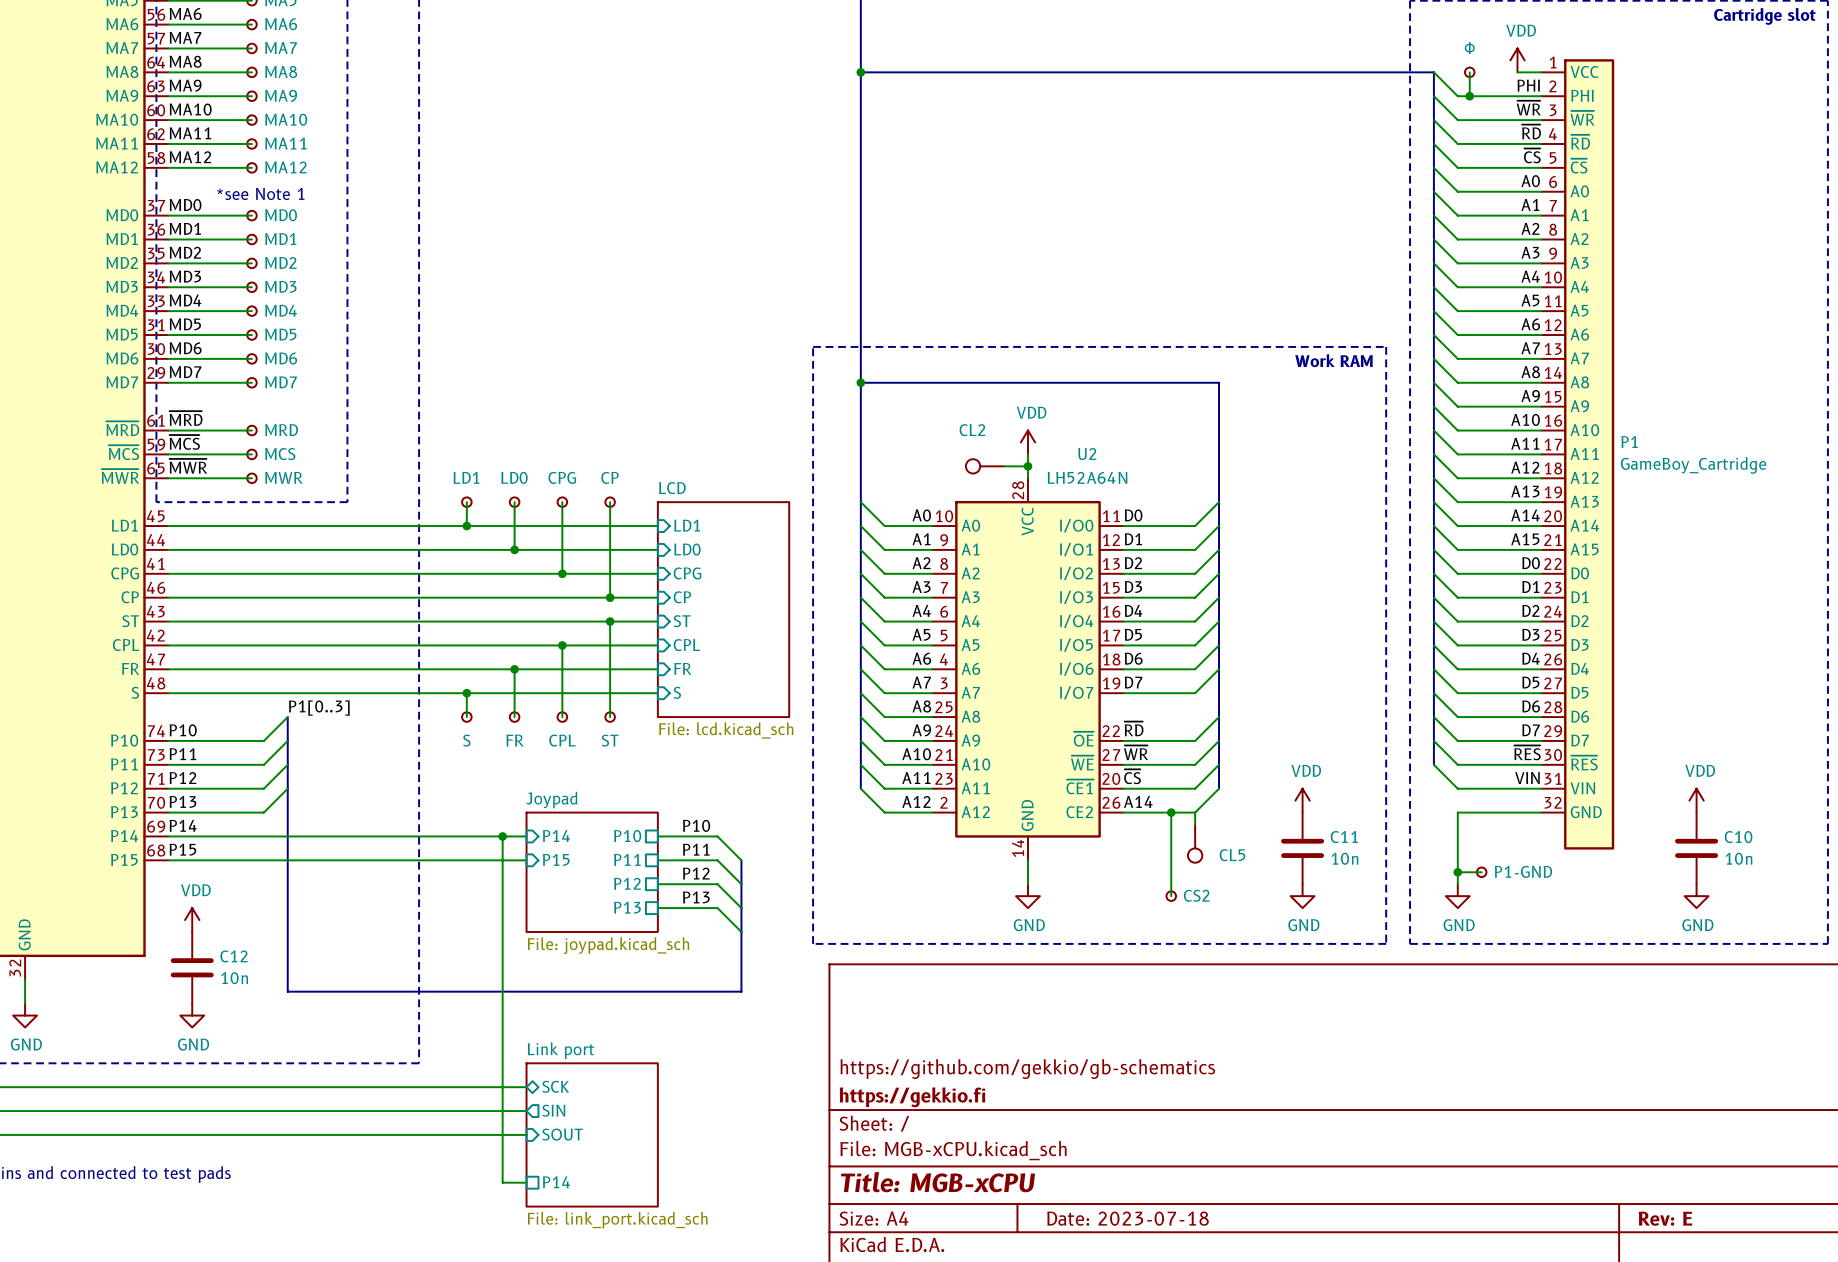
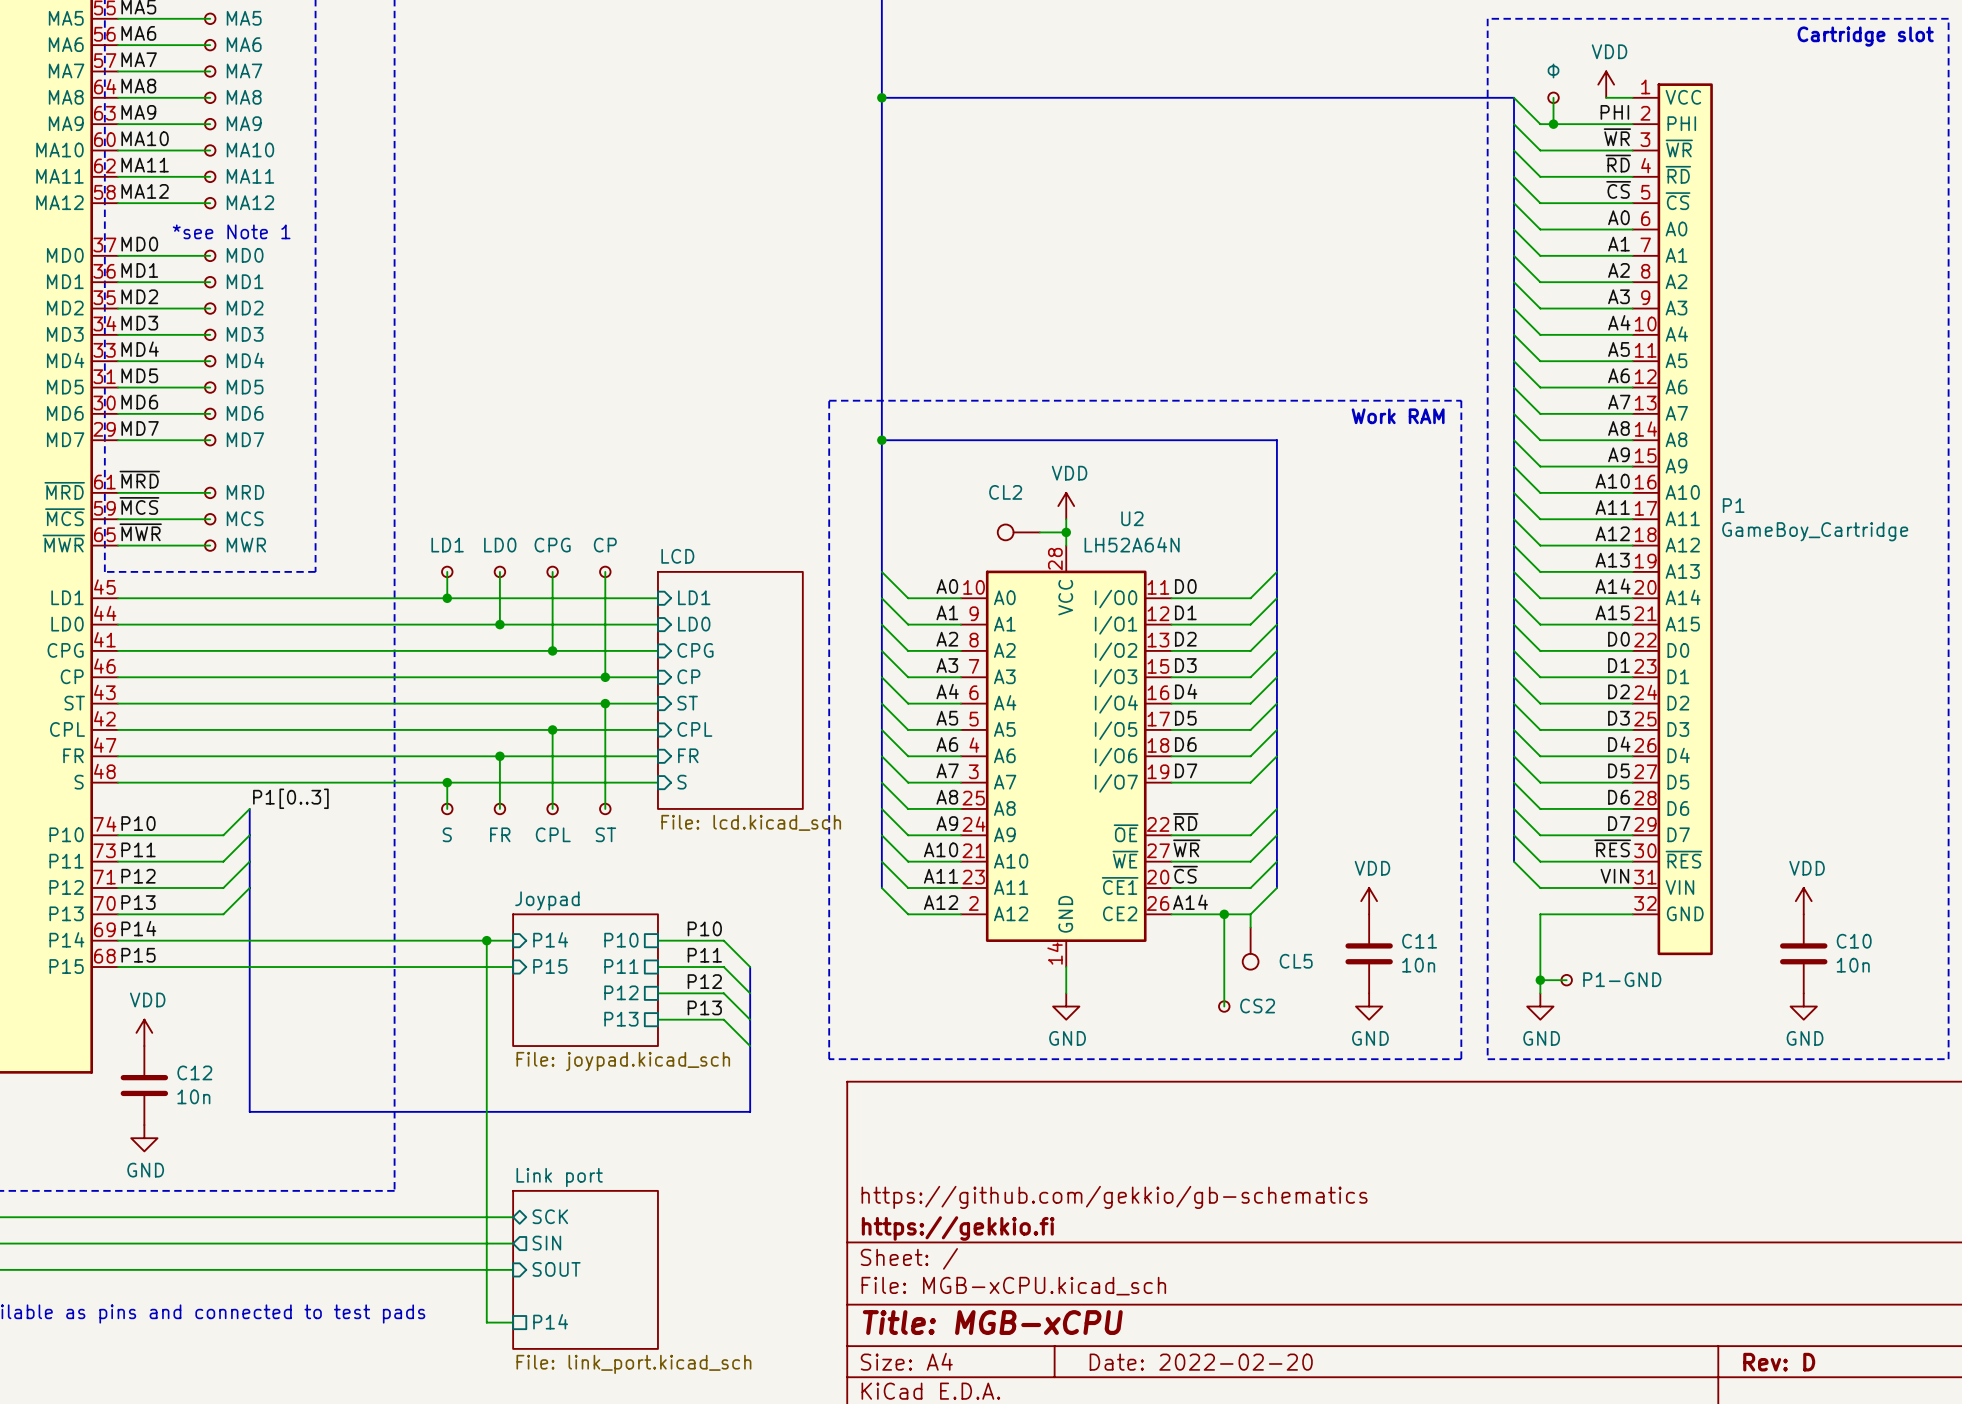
title block: Date: 2023-07-18 (1128, 1218) -> Date: 2022-02-20 (1201, 1362)
title block: Rev: E (1665, 1218) -> Rev: D (1779, 1362)

